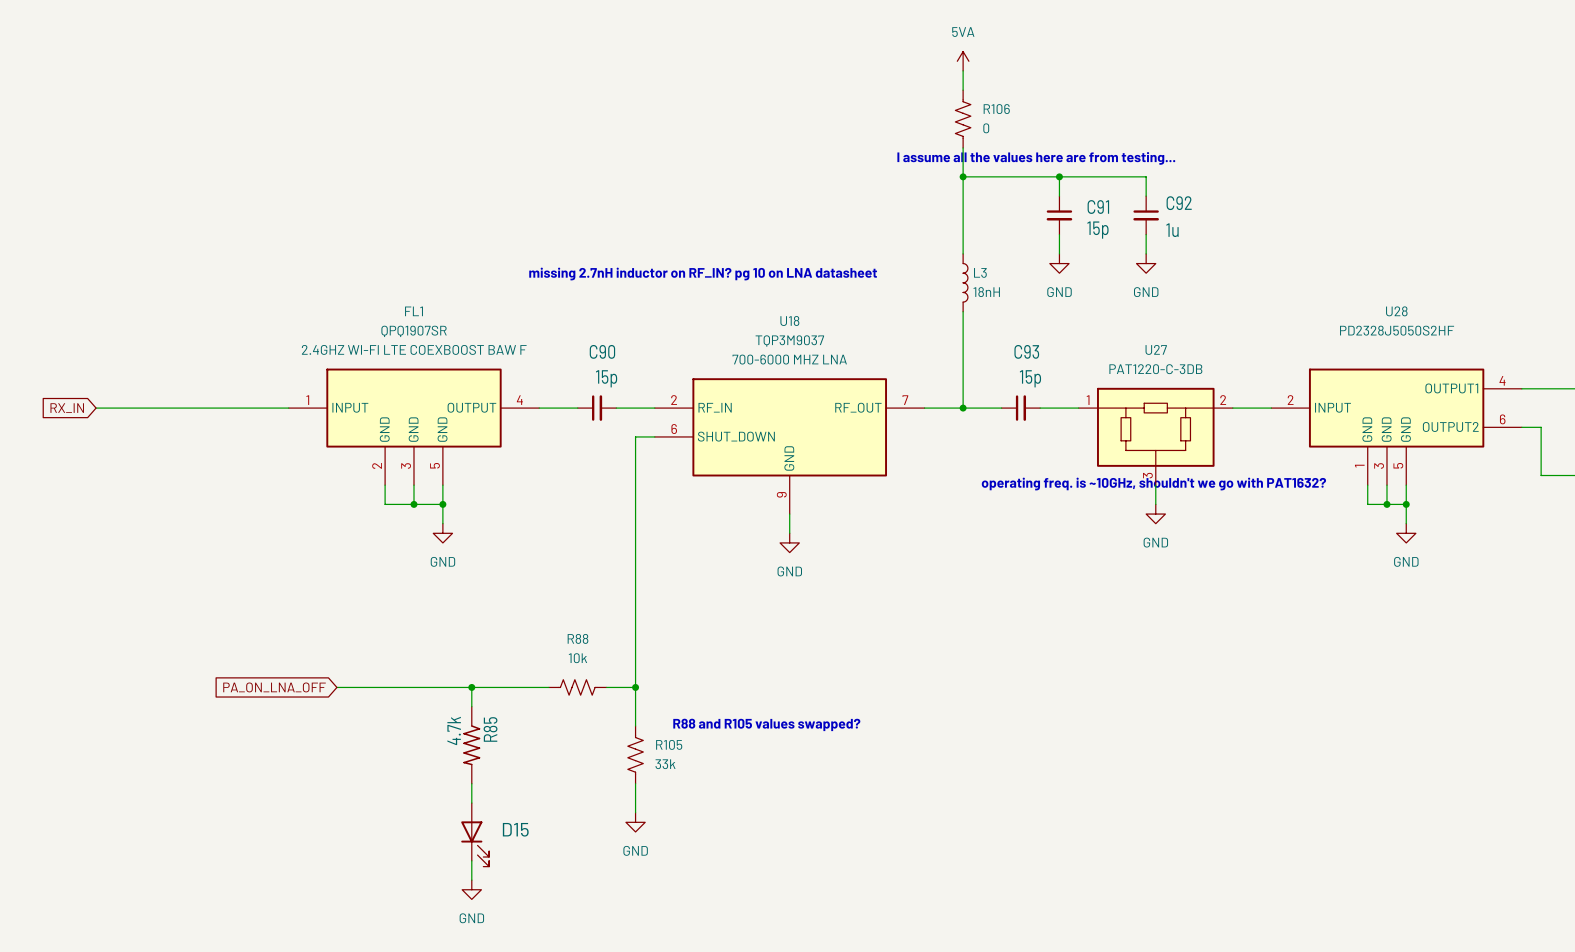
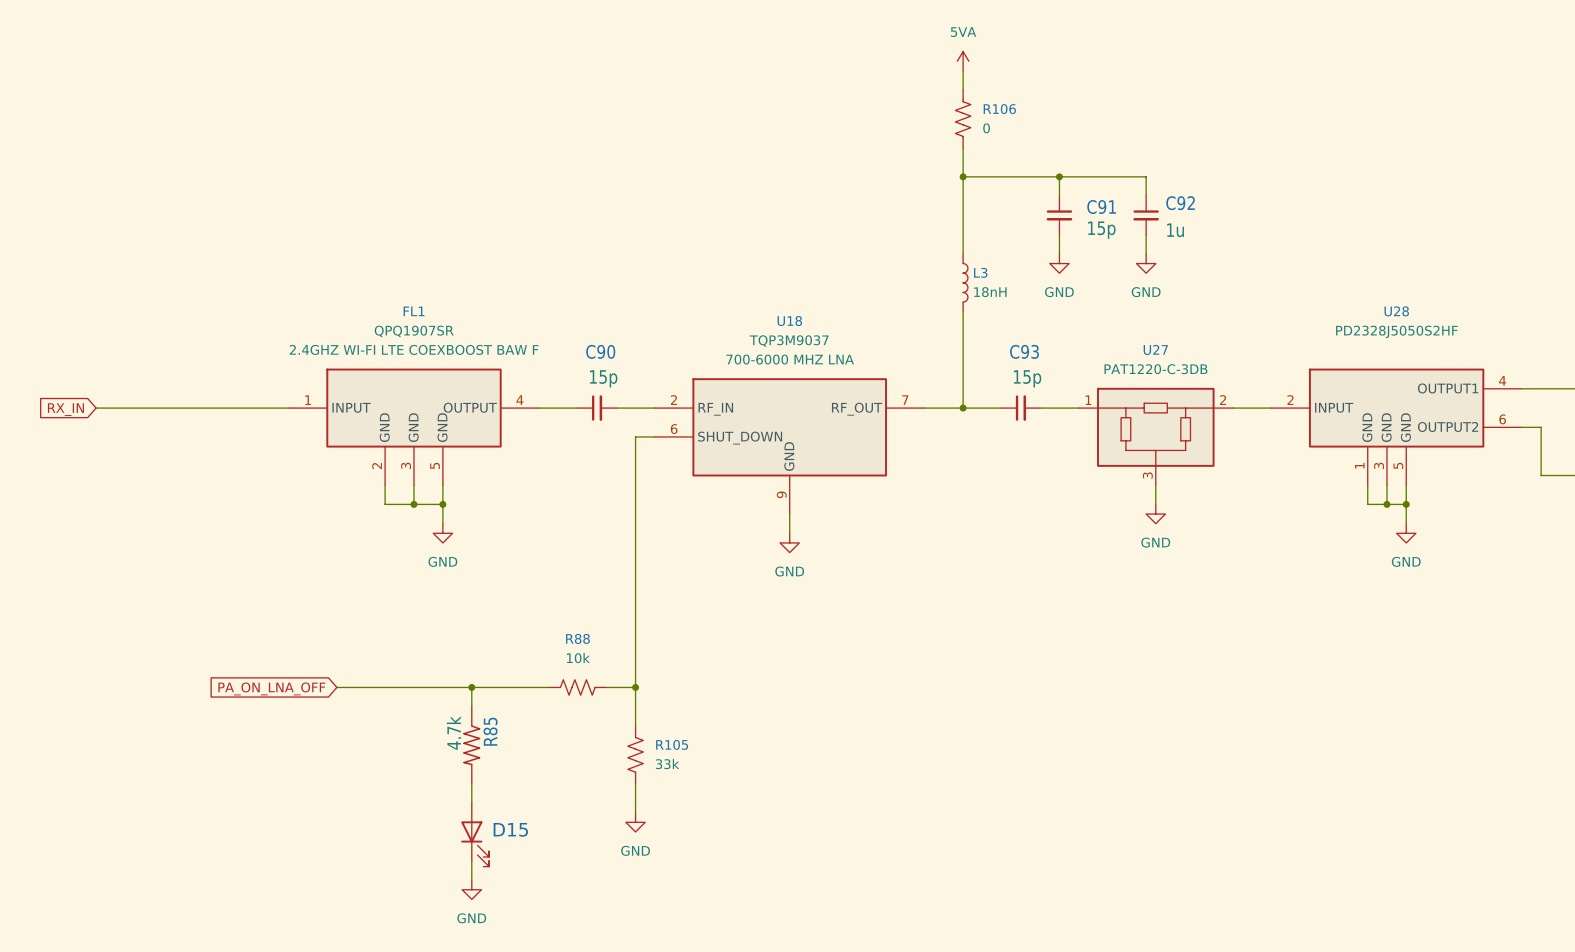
text: I assume all the values here are from testing... (1036, 158) -> none
text: missing 2.7nH inductor on RF_IN? pg 10 on LNA datasheet (703, 274) -> none
text: operating freq. is ~10GHz, shouldn't we go with PAT1632? (1153, 484) -> none
text: R88 and R105 values swapped? (766, 724) -> none

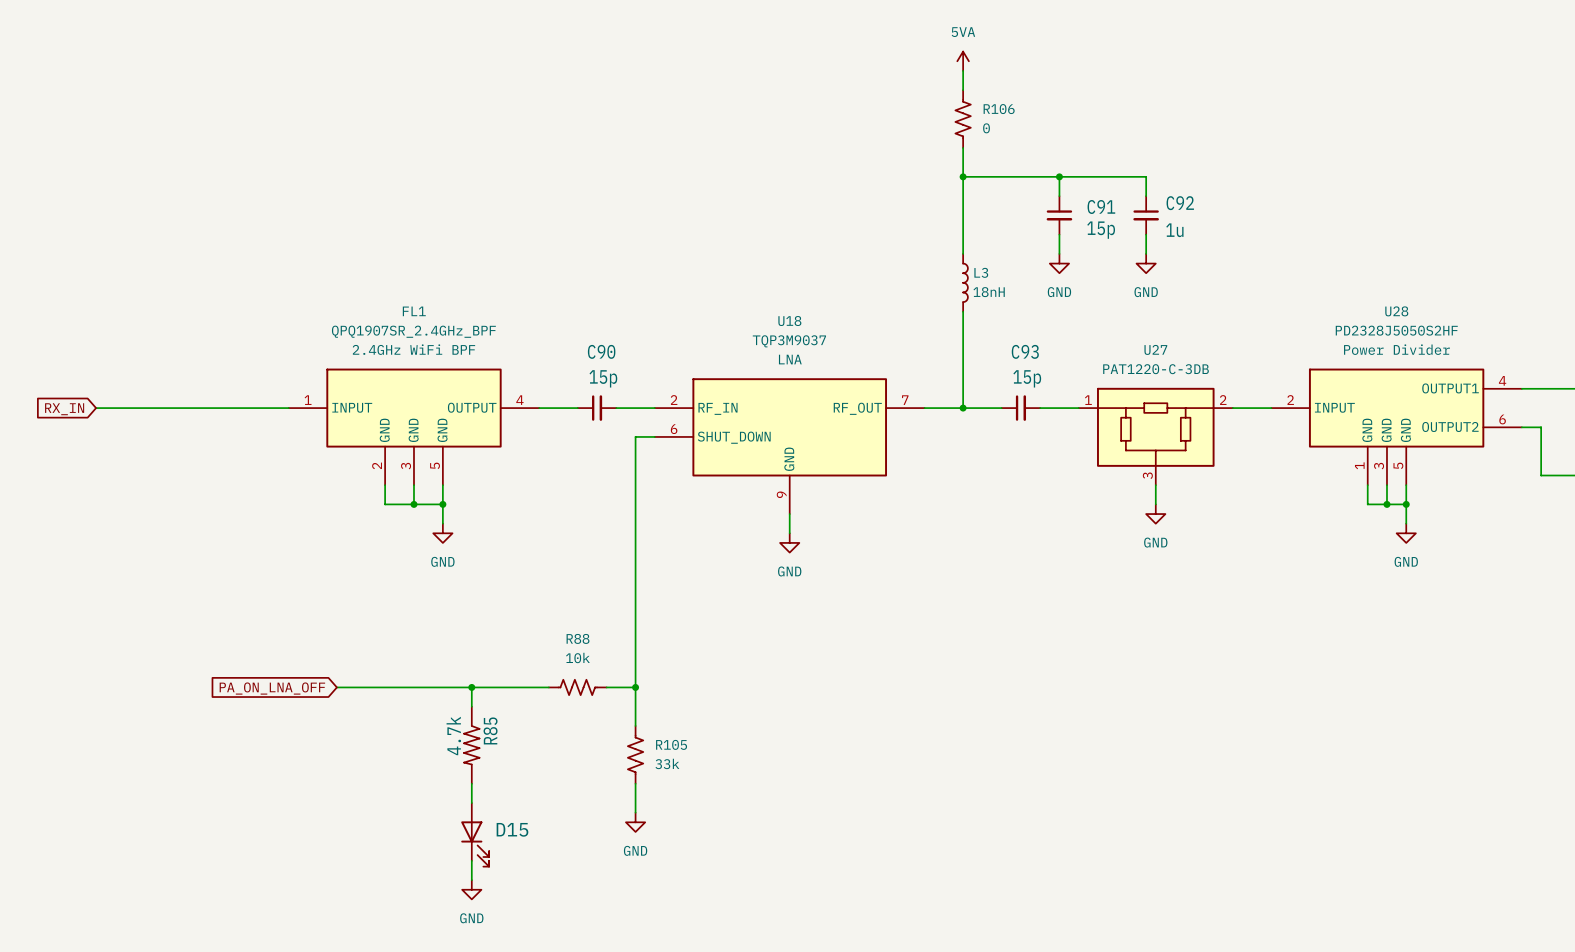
FL1 value: QPQ1907SR (414, 331) -> QPQ1907SR_2.4GHz_BPF (413, 331)
FL1 text: 2.4GHZ WI-FI LTE COEXBOOST BAW F (414, 349) -> 2.4GHz WiFi BPF (413, 349)
U28 text: none -> Power Divider (1396, 349)
U18 text: 700-6000 MHZ LNA (790, 359) -> LNA (790, 359)

